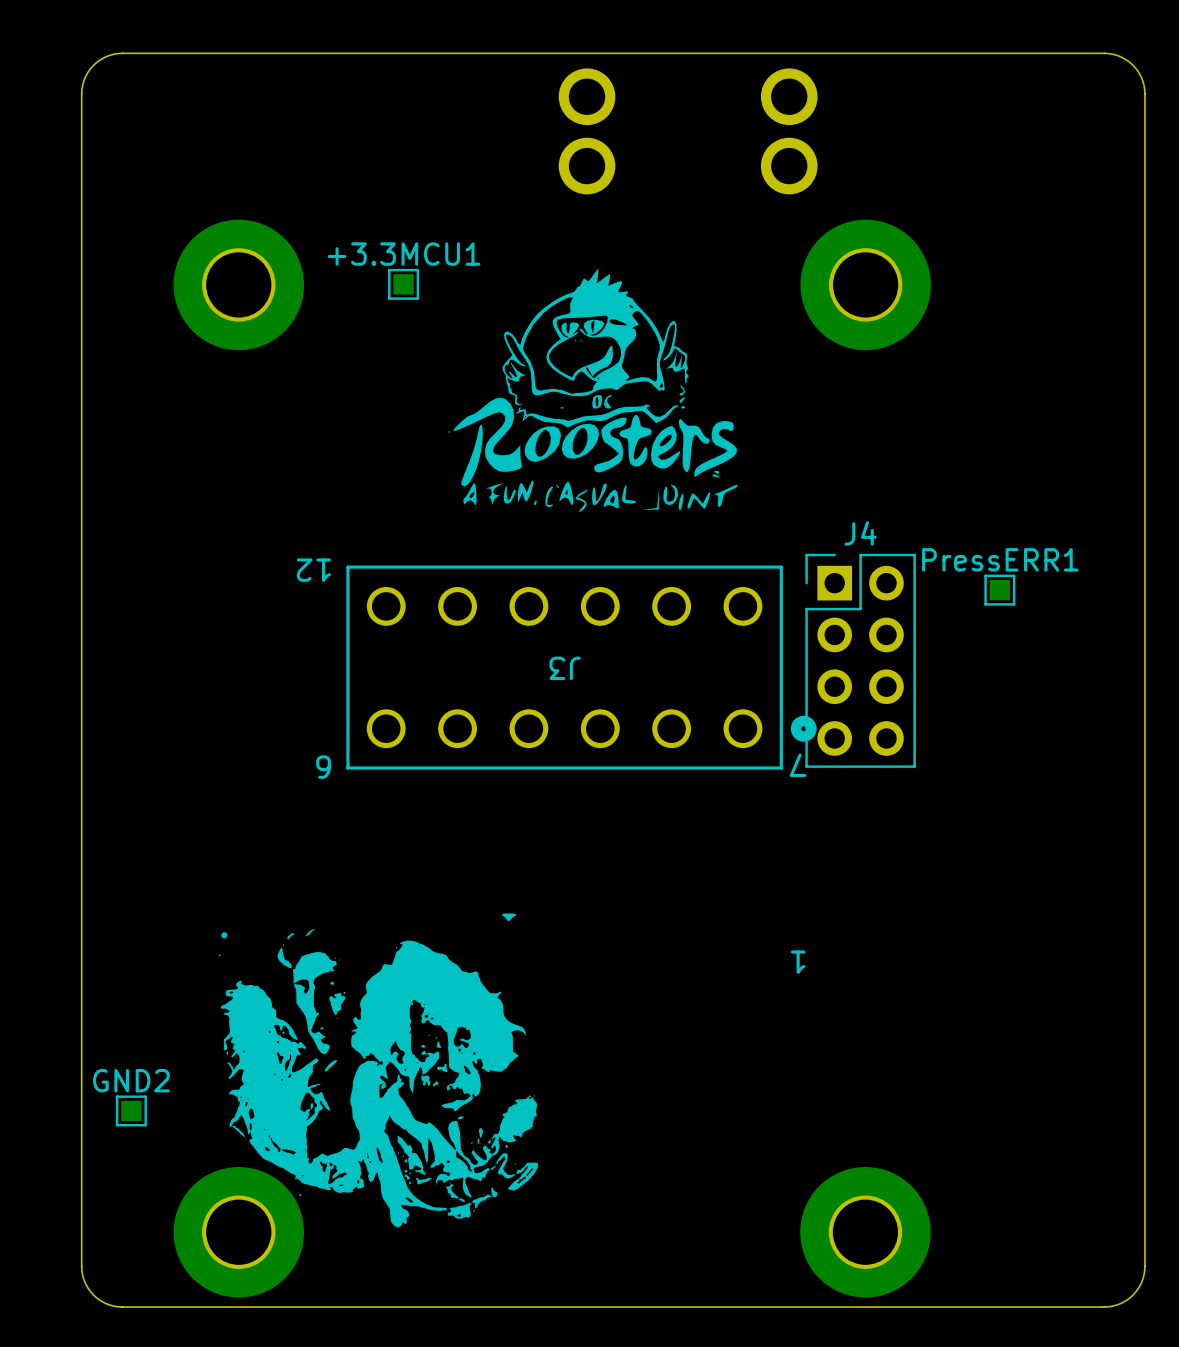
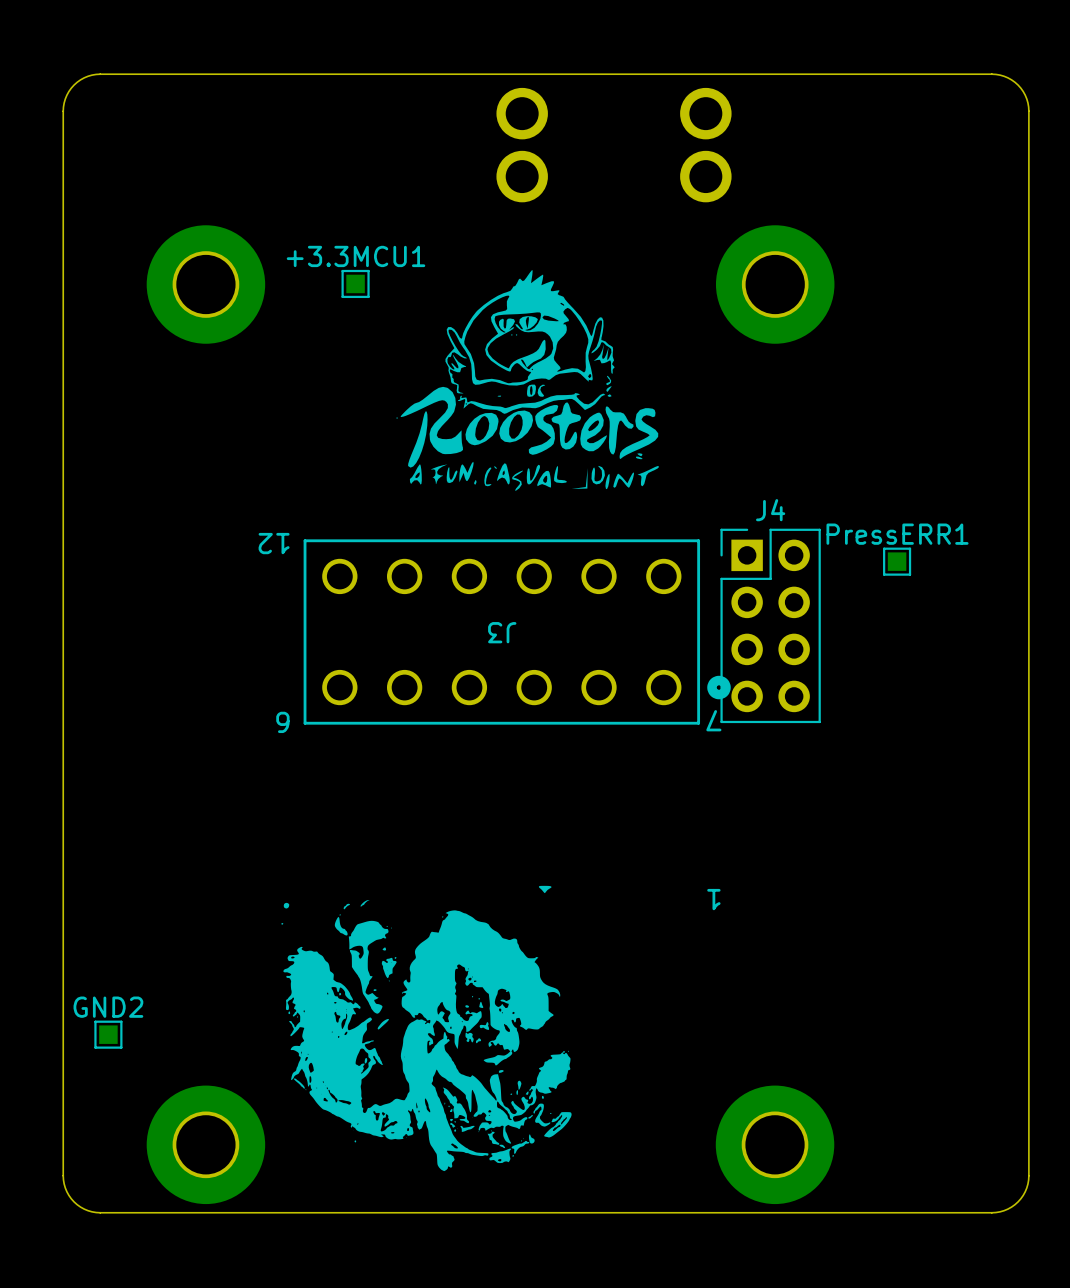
drawing position: (378, 1070) -> (426, 1028)

